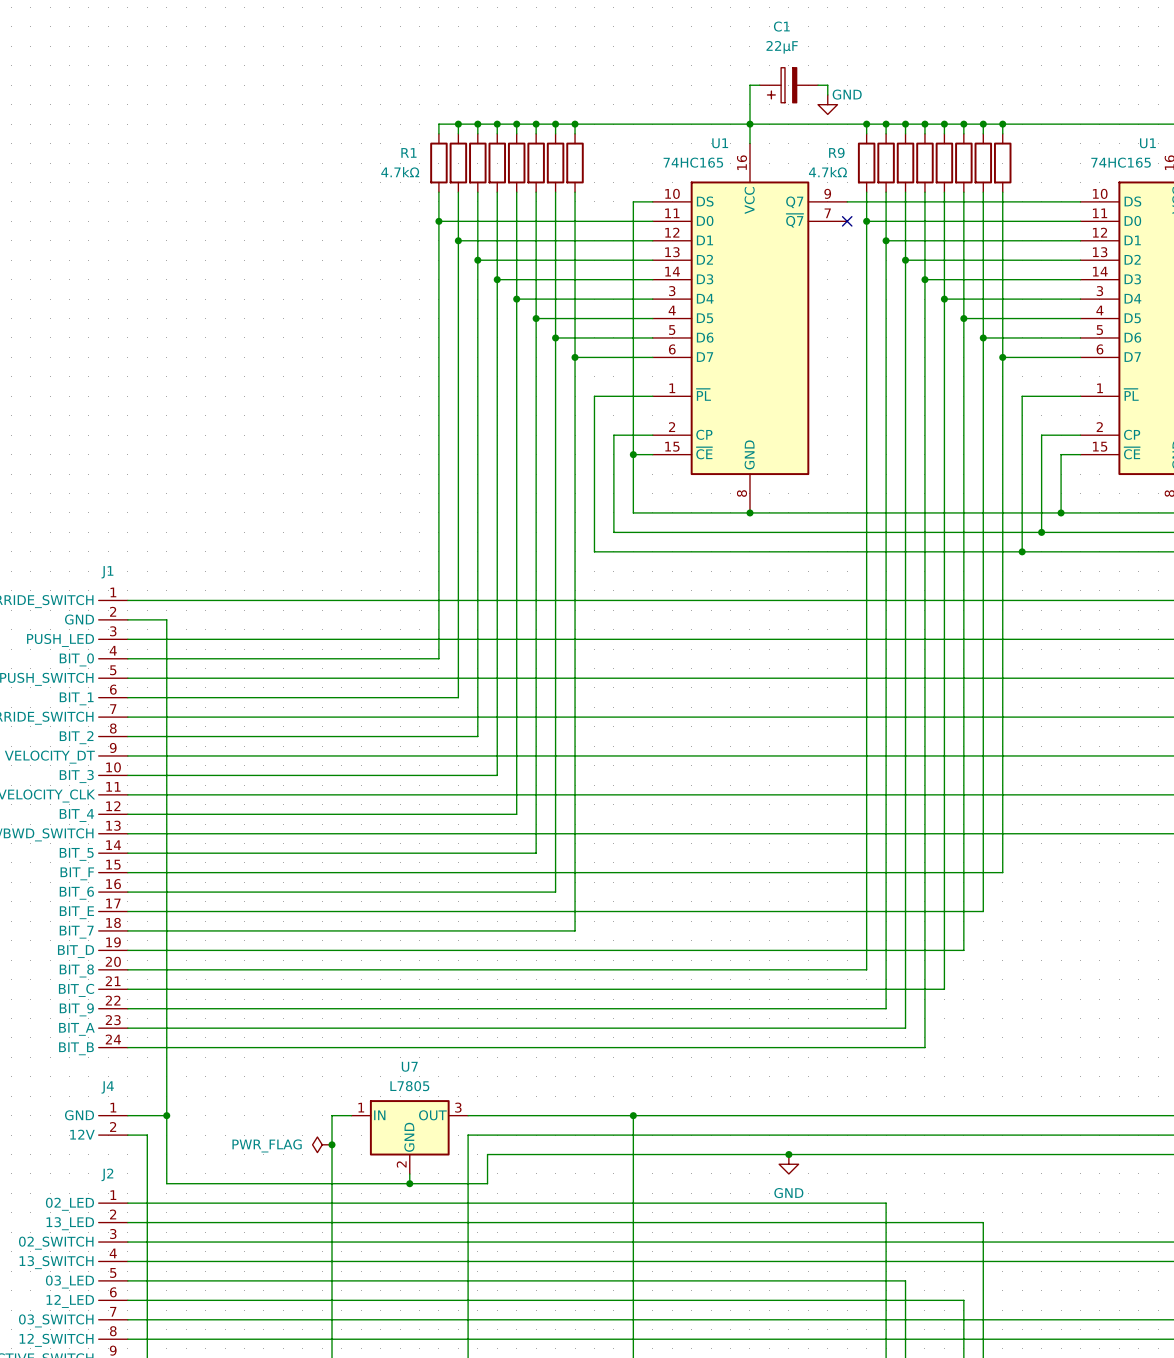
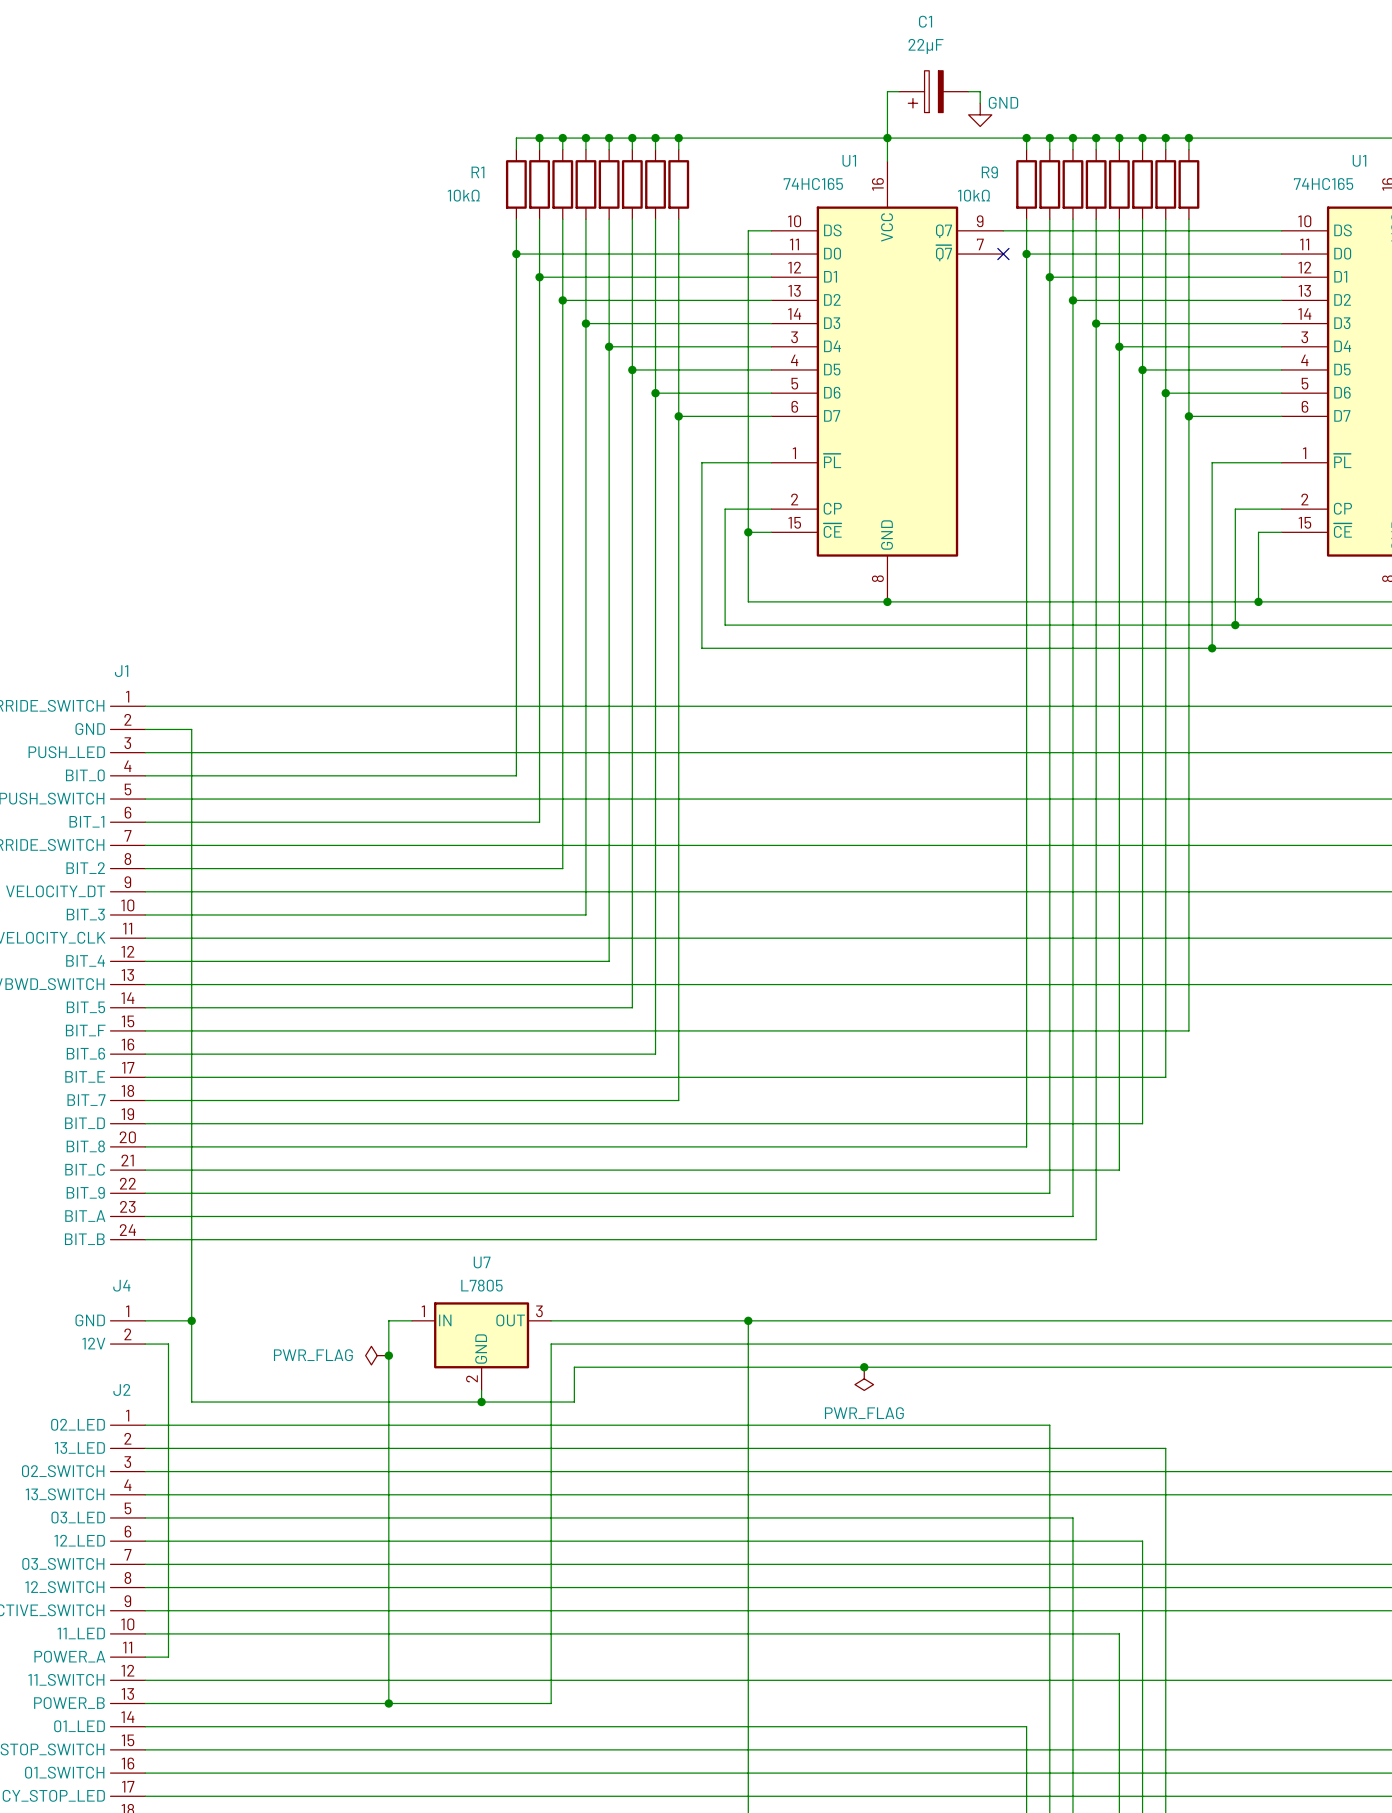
R1 value: 4.7kΩ (400, 172) -> 10kΩ (463, 195)
R9 value: 4.7kΩ (827, 172) -> 10kΩ (973, 195)
junction: none -> (864, 1367)
junction: (788, 1154) -> none
power symbol: none -> PWR_FLAG (864, 1378)
power symbol: GND (788, 1164) -> none

